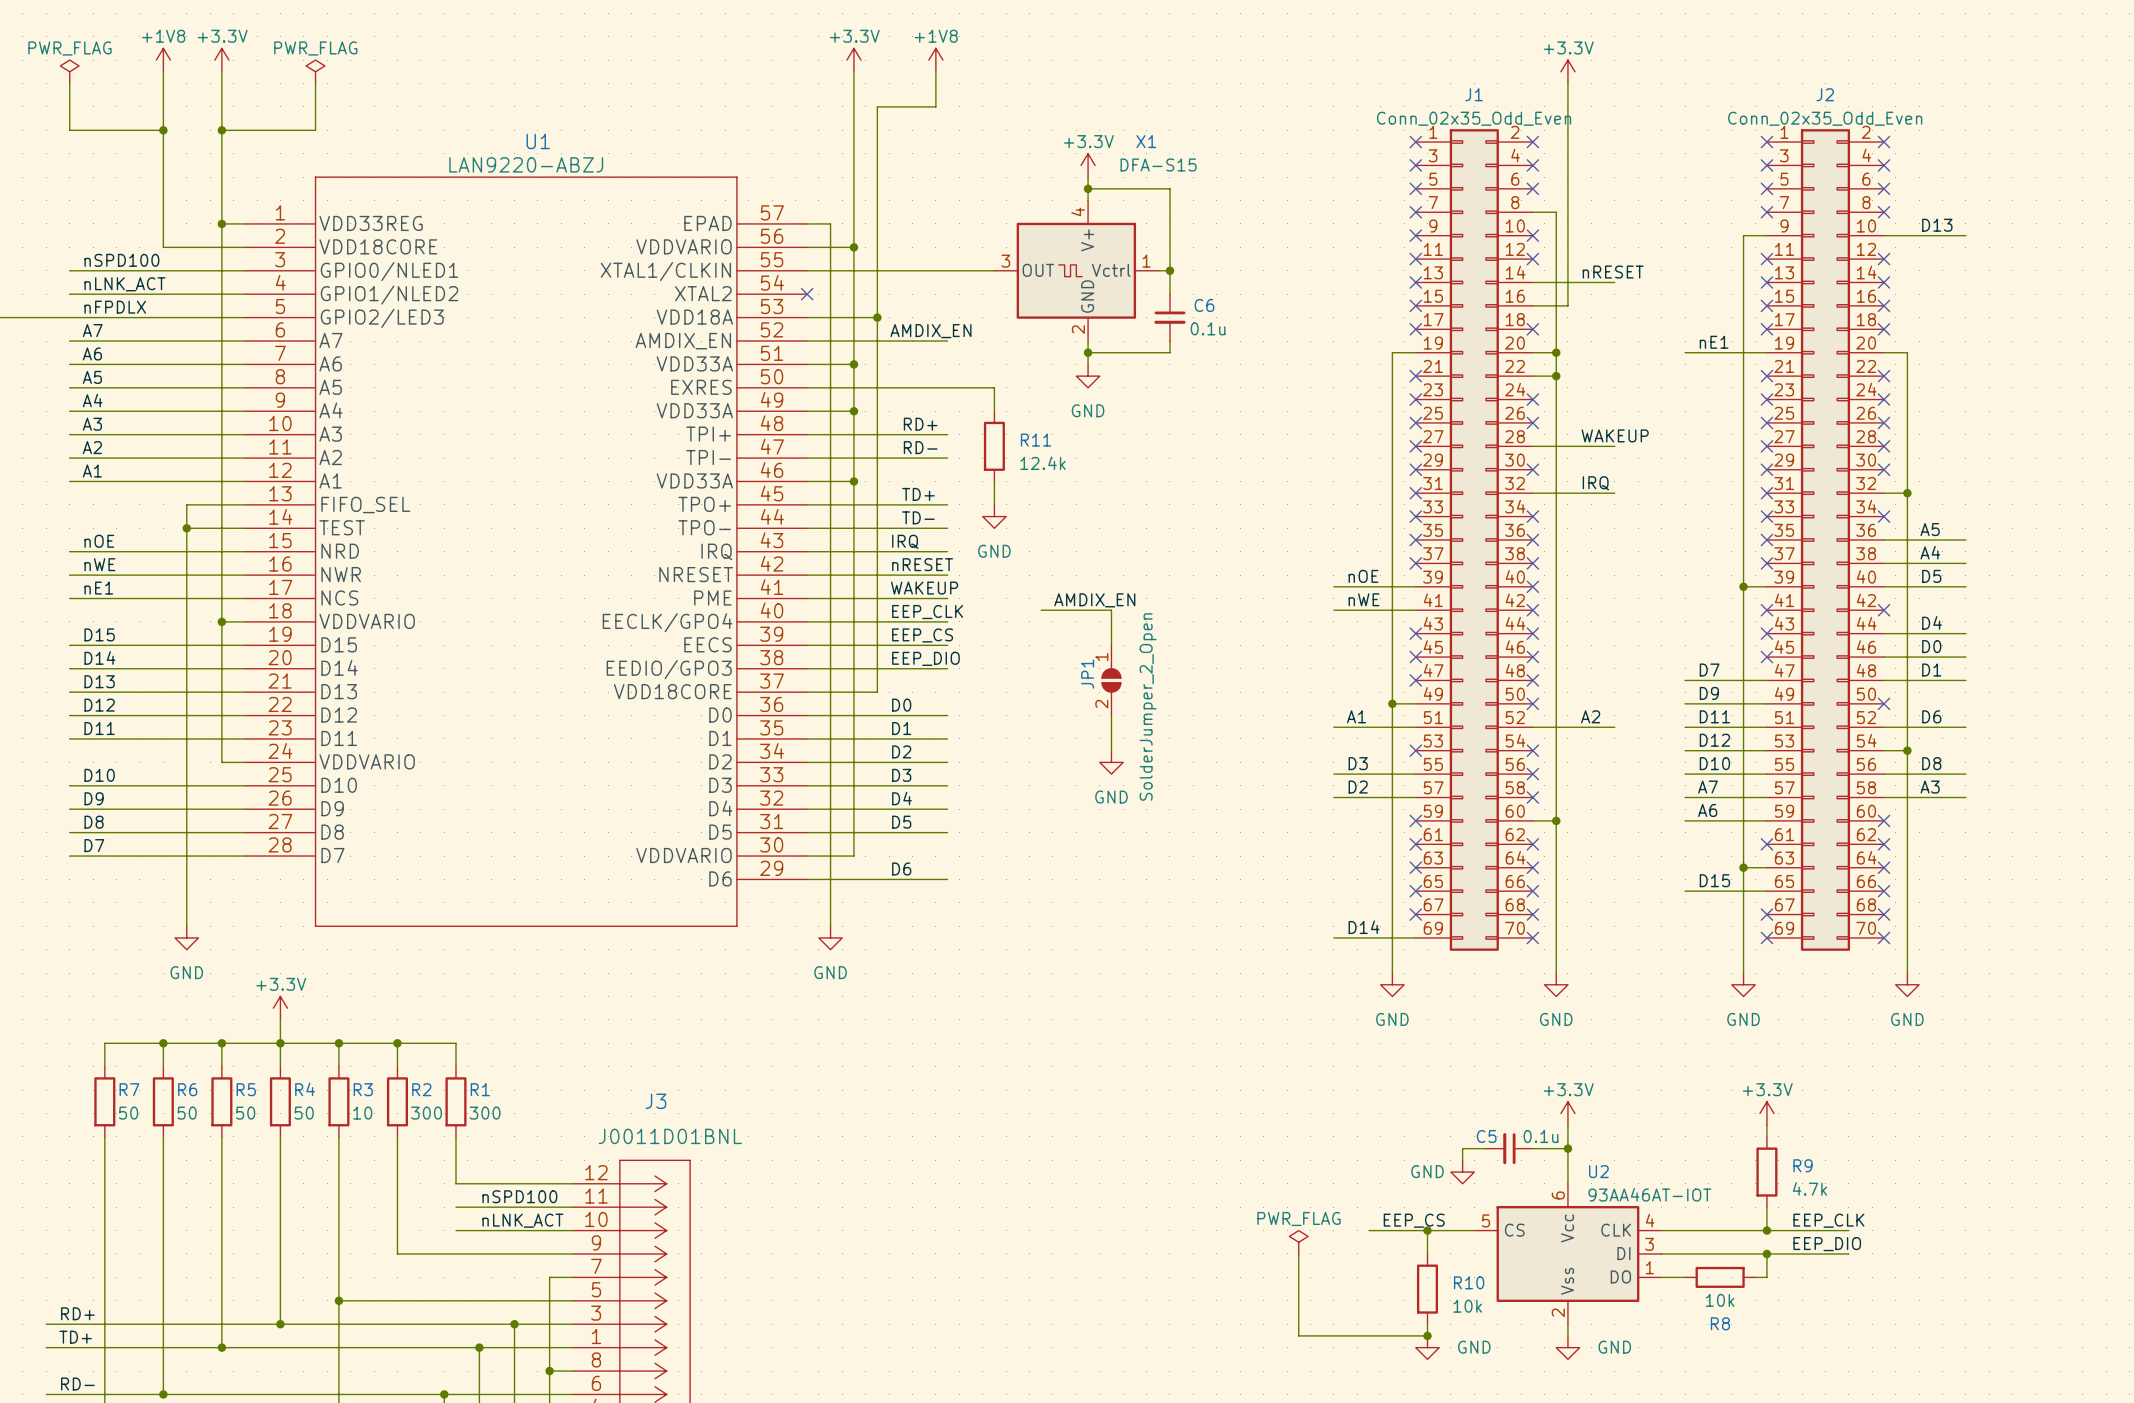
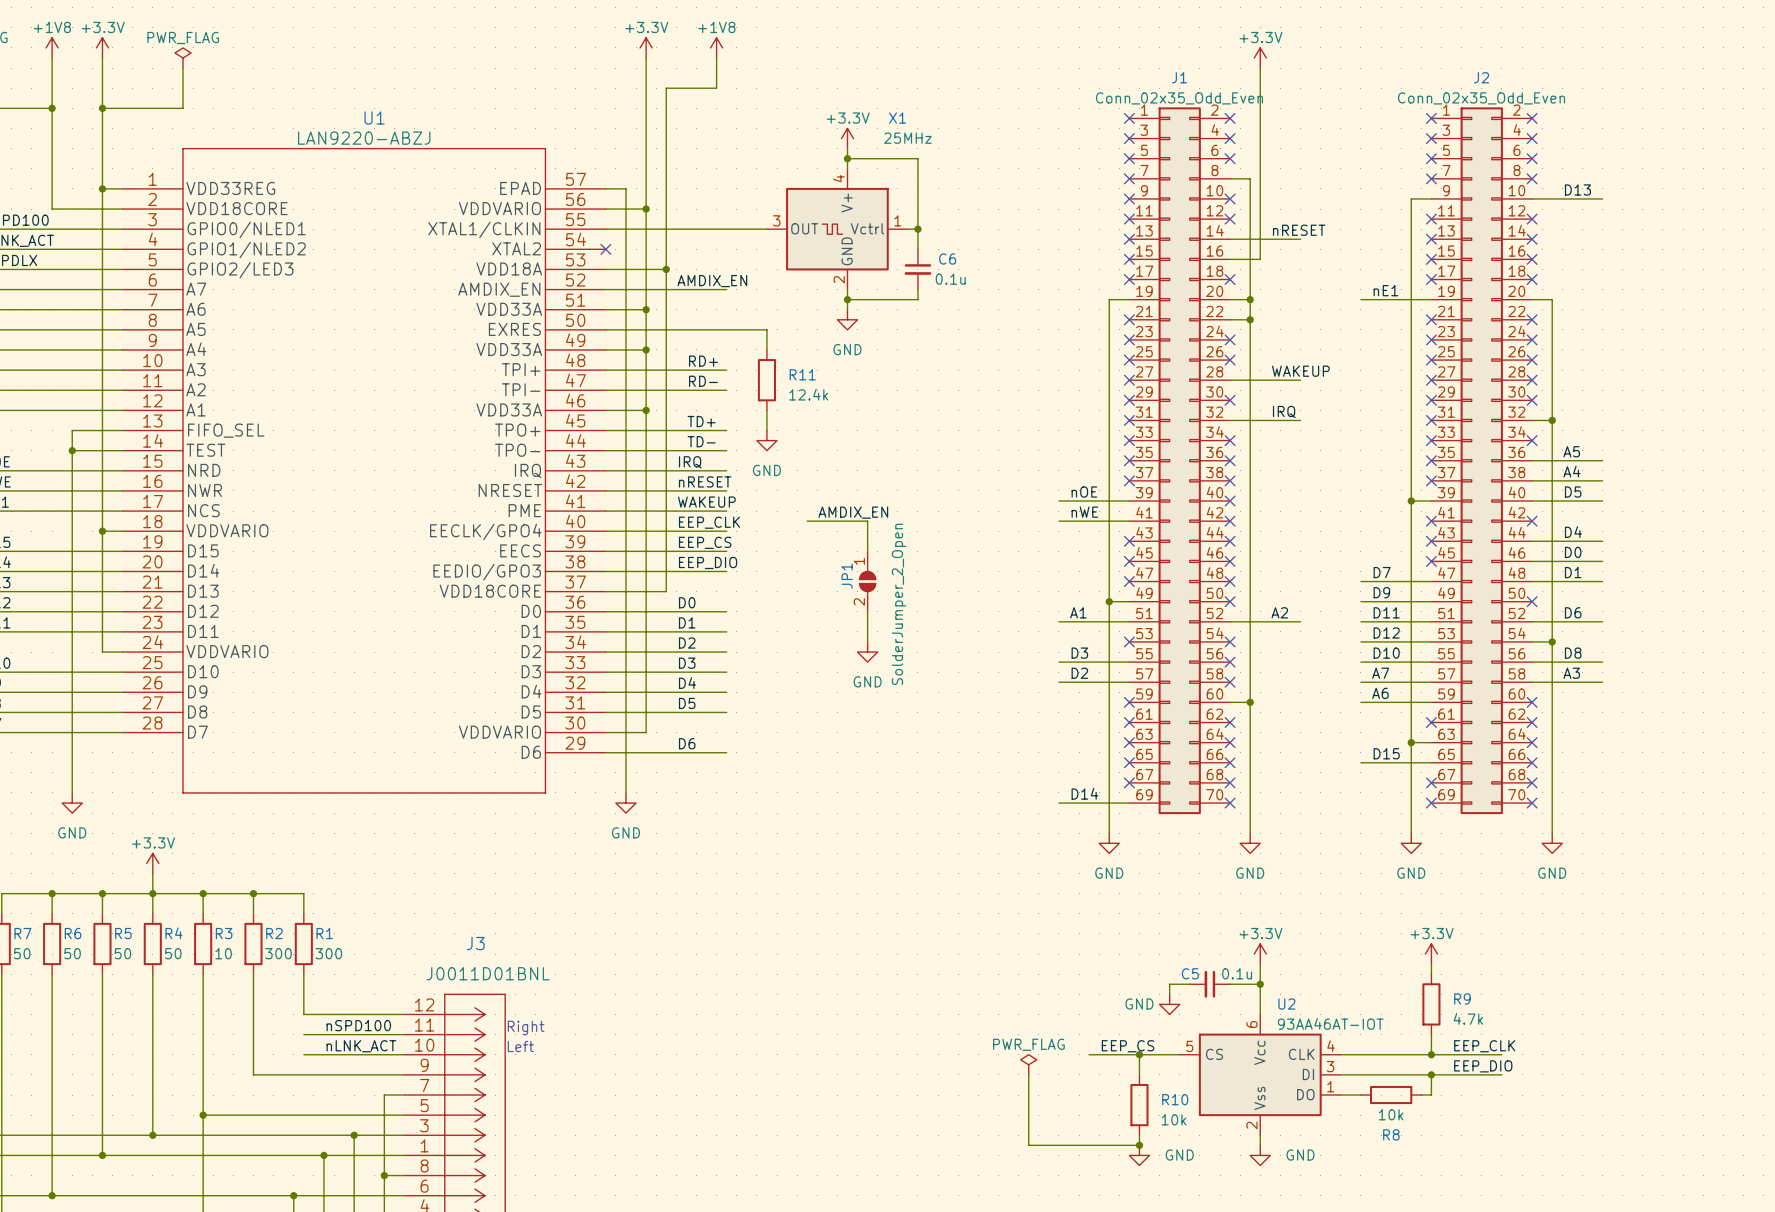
X1 value: DFA-S15 (1158, 164) -> 25MHz (907, 138)
text: none -> Right (526, 1028)
text: none -> Left (520, 1046)

